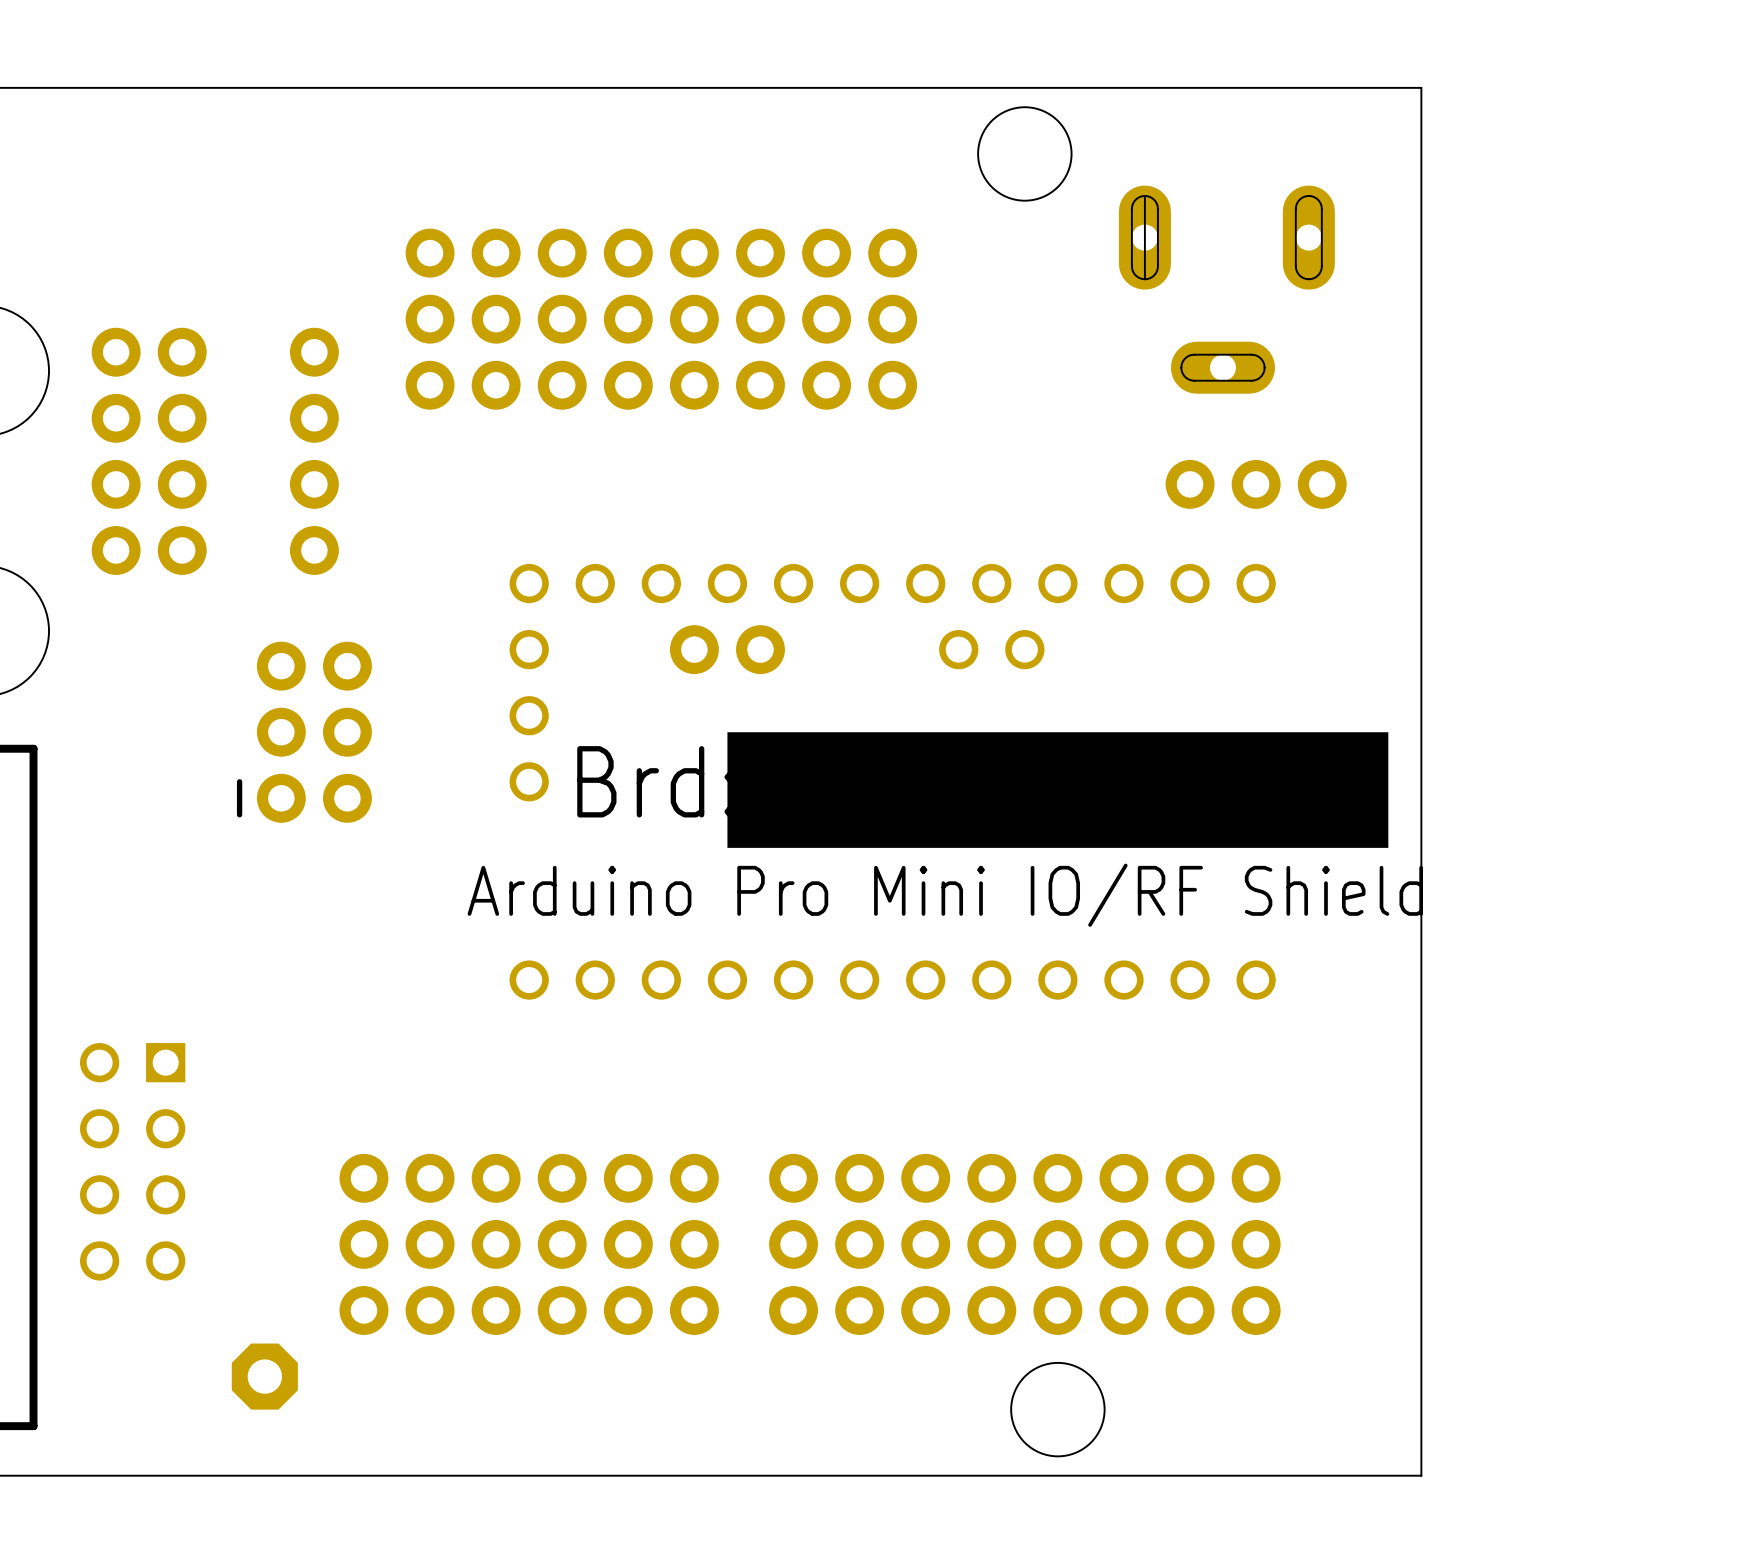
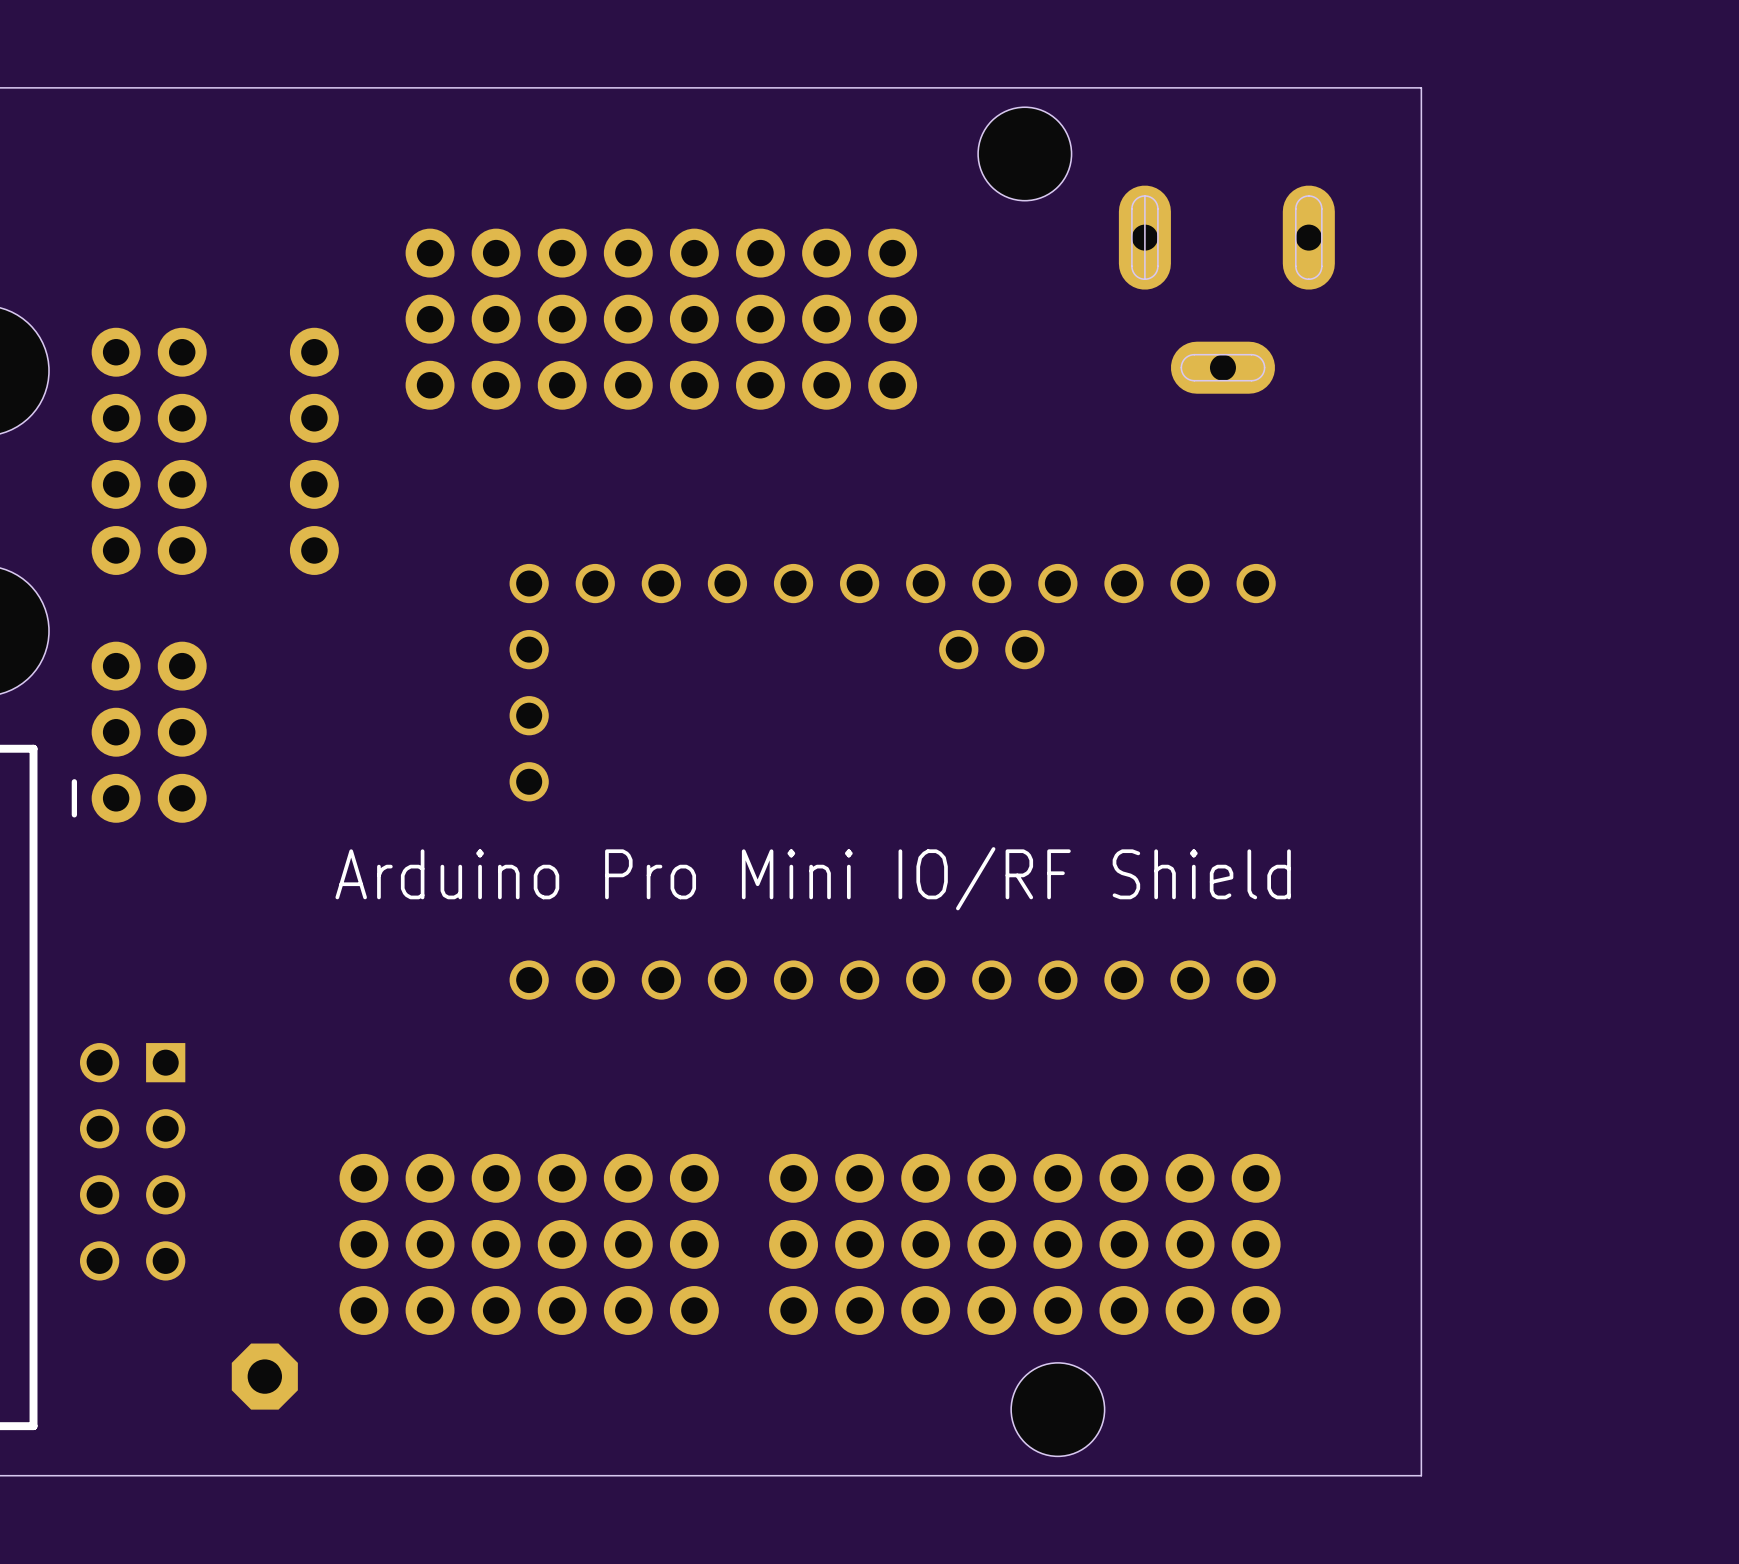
part: (1256, 484) -> none
part: (727, 649) -> none
part position: (304, 732) -> (139, 732)
drawing: [727, 732, 1389, 848] -> none
text: Brd: (656, 781) -> none
text position: Arduino Pro Mini IO/RF Shield (945, 895) -> Arduino Pro Mini IO/RF Shield (813, 878)

